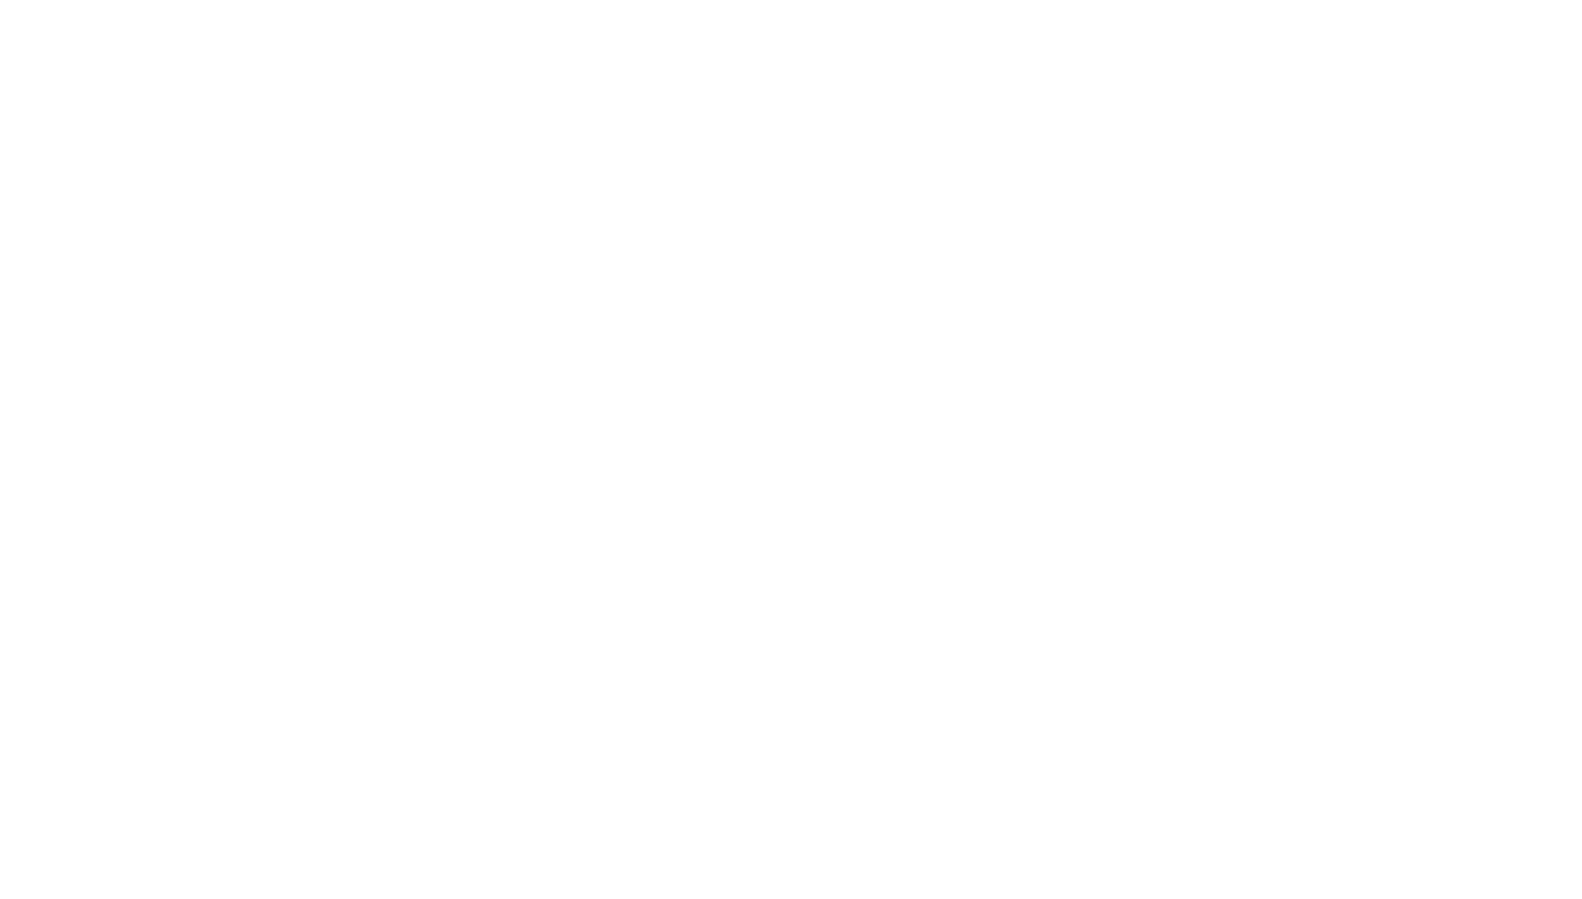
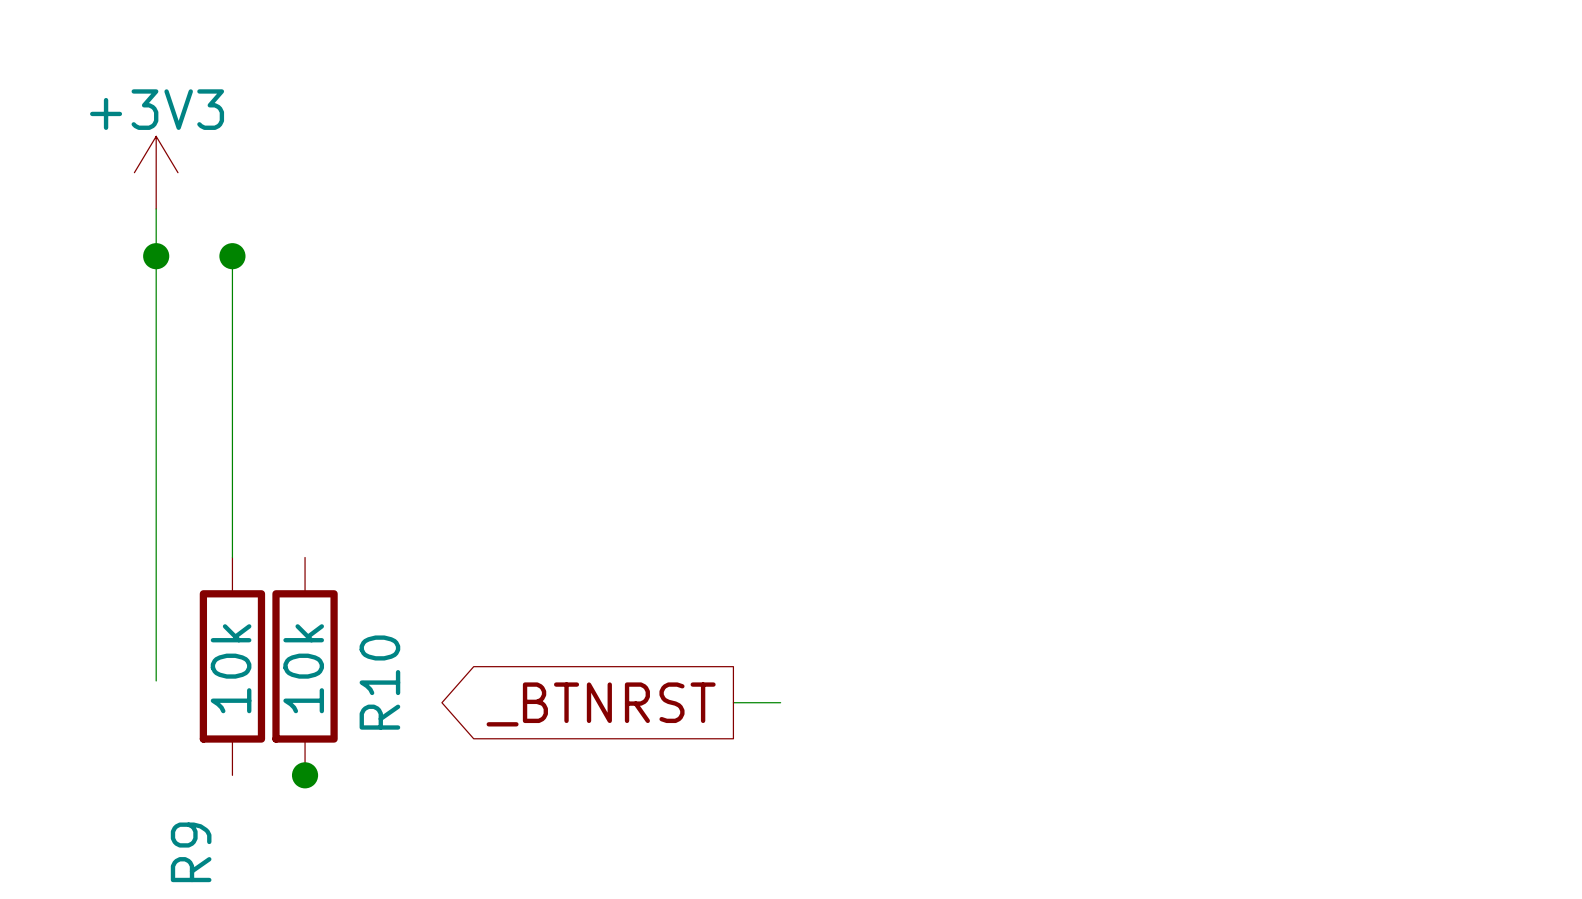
power symbol: none -> +3V3 (156, 172)
wire: none -> (156, 208) (156, 680)
junction: none -> (156, 256)
wire: none -> (232, 256) (232, 557)
junction: none -> (232, 256)
R9: none -> 10k (232, 666)
R10: none -> 10k (305, 666)
wire: none -> (733, 702) (780, 702)
global label: none -> _BTNRST (601, 704)
junction: none -> (305, 775)

